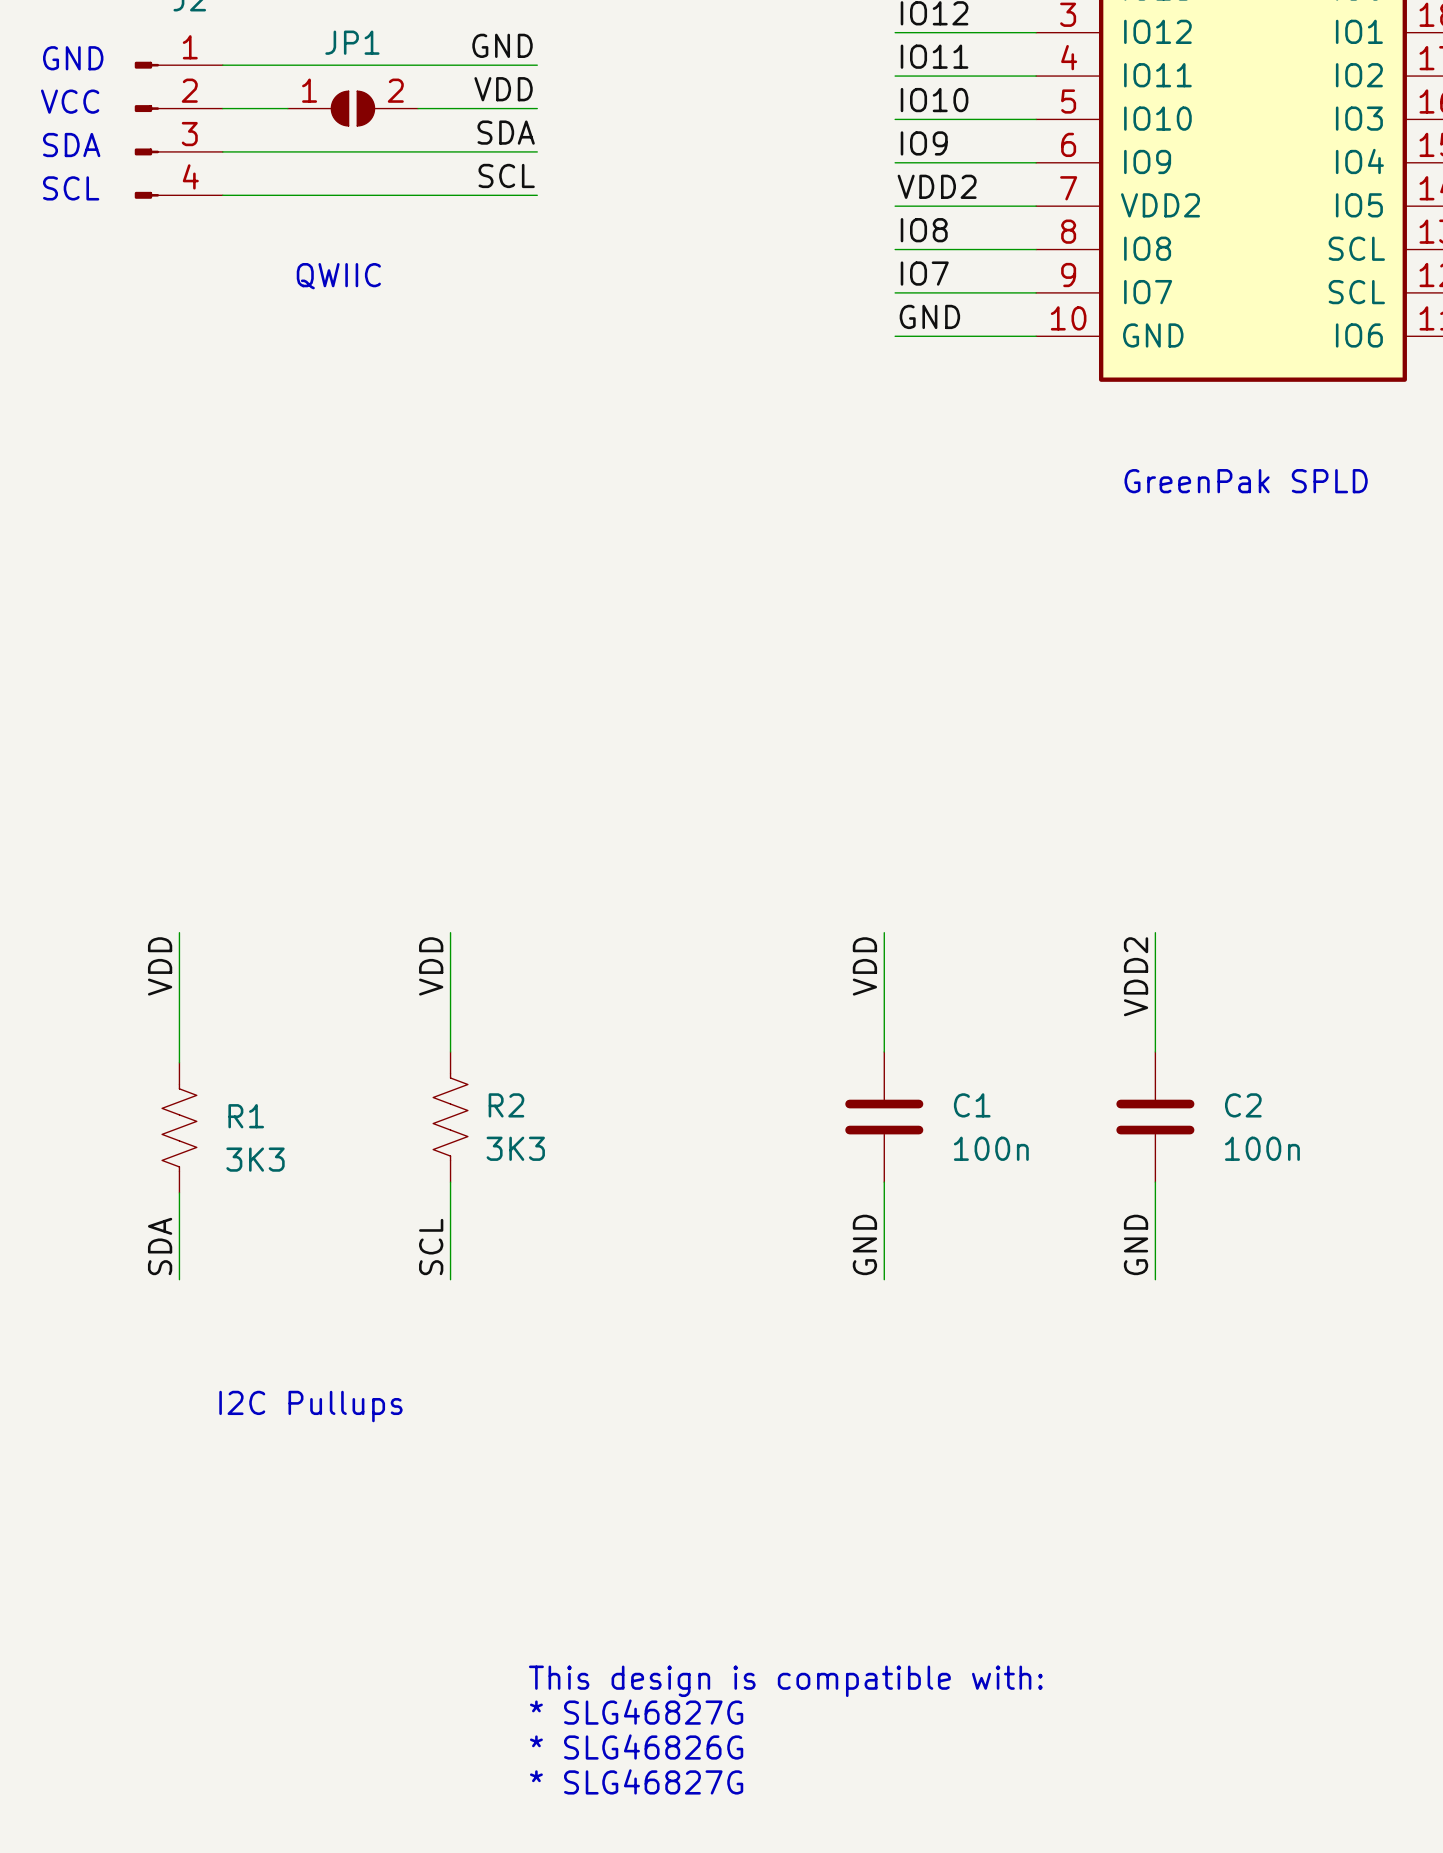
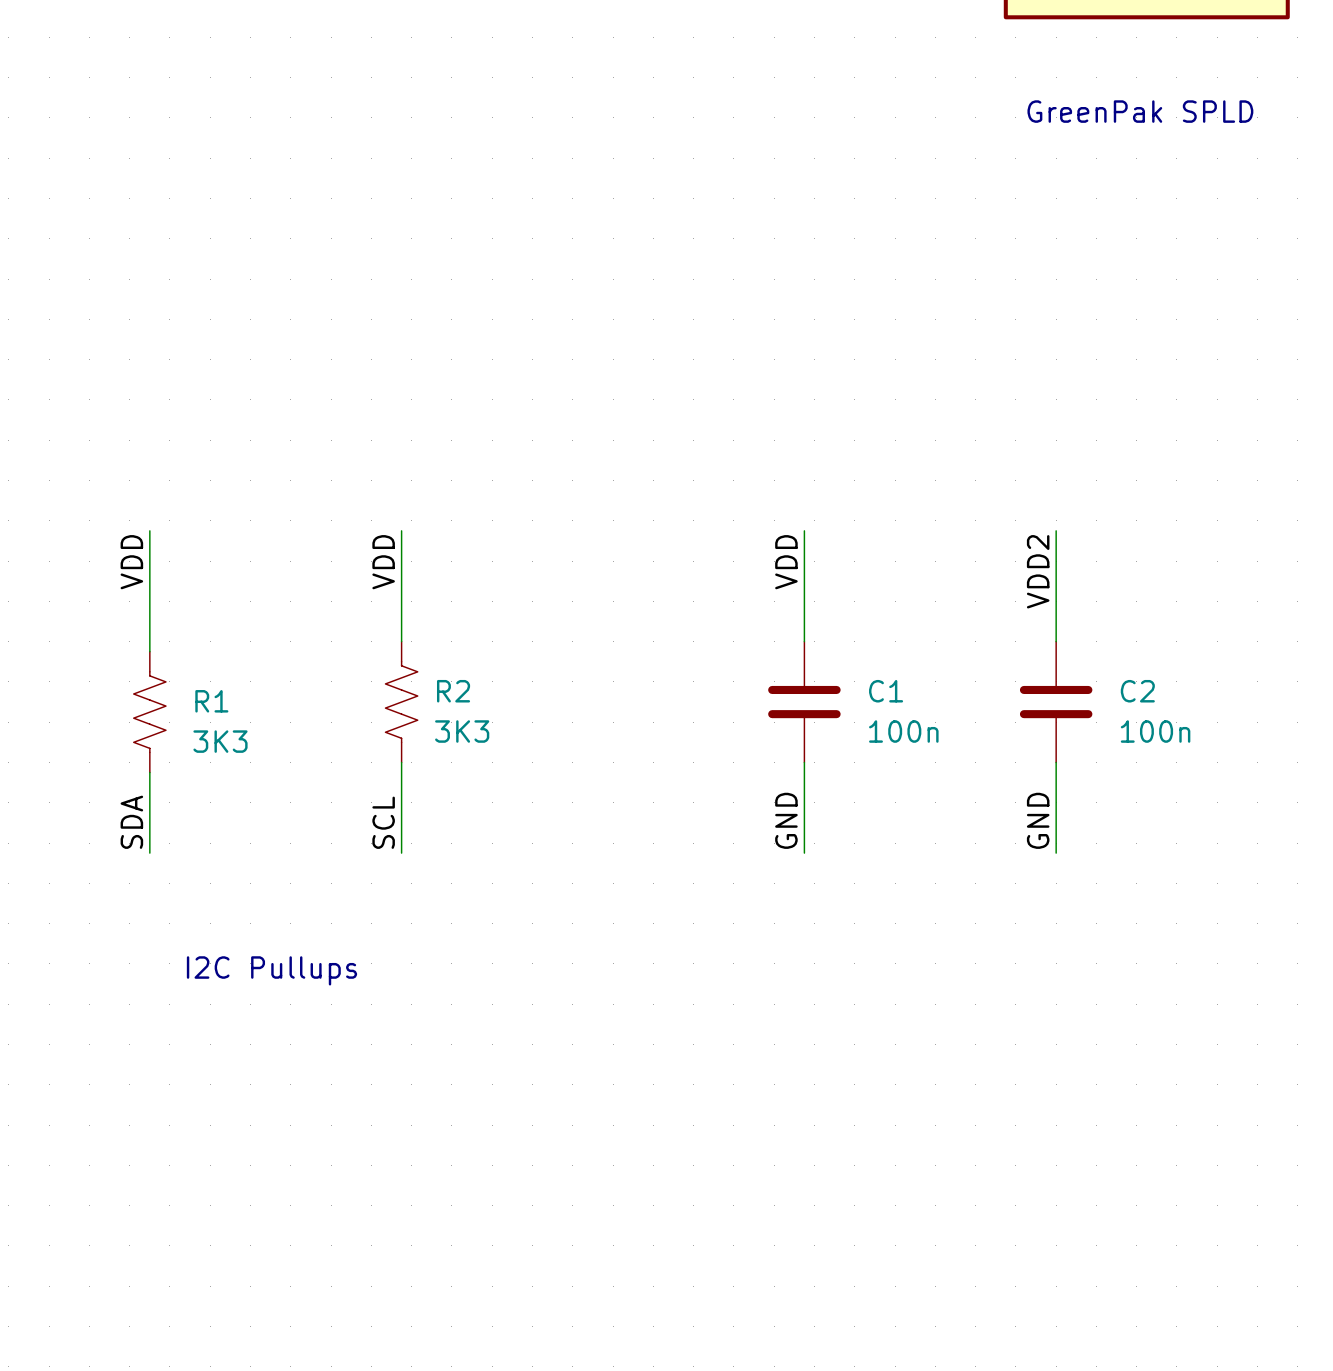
text: This design is compatible with: (785, 1681) -> none
text: * SLG46827G (636, 1712) -> none
text: * SLG46826G (636, 1747) -> none
text: * SLG46827G (636, 1781) -> none

